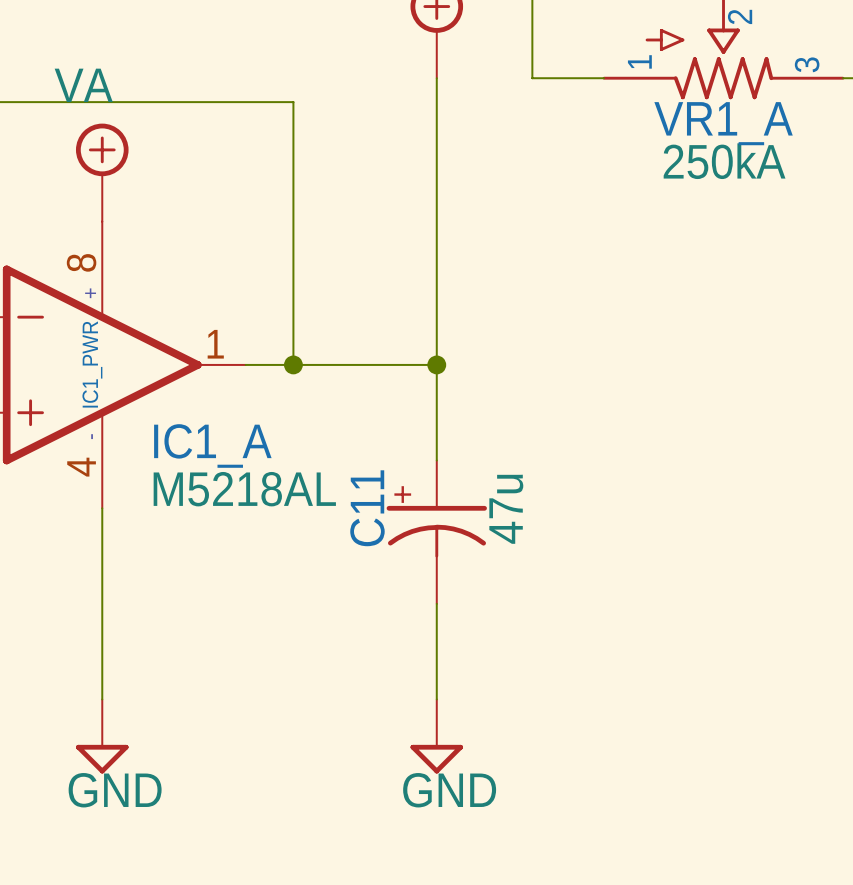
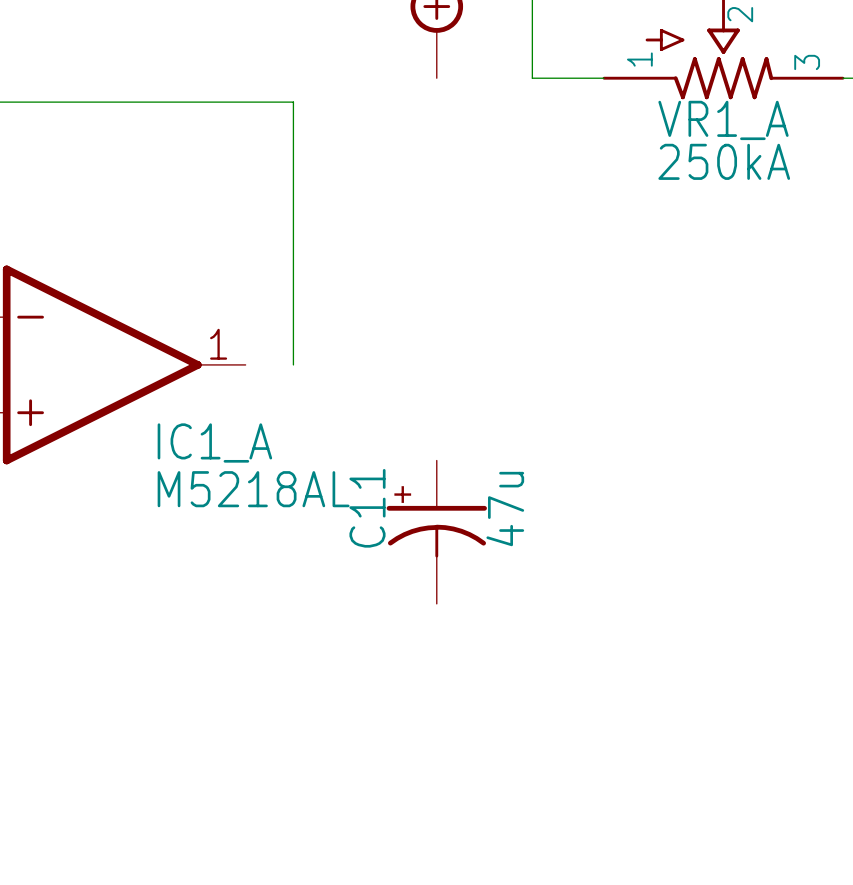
wire: (436, 78) (436, 460) -> none
power symbol: VA (102, 172) -> none
IC1_PWR: (102, 364) -> none
wire: (245, 364) (436, 364) -> none
junction: (293, 364) -> none
junction: (436, 364) -> none
wire: (102, 508) (102, 699) -> none
wire: (436, 603) (436, 699) -> none
power symbol: GND (102, 736) -> none
power symbol: GND (436, 736) -> none

